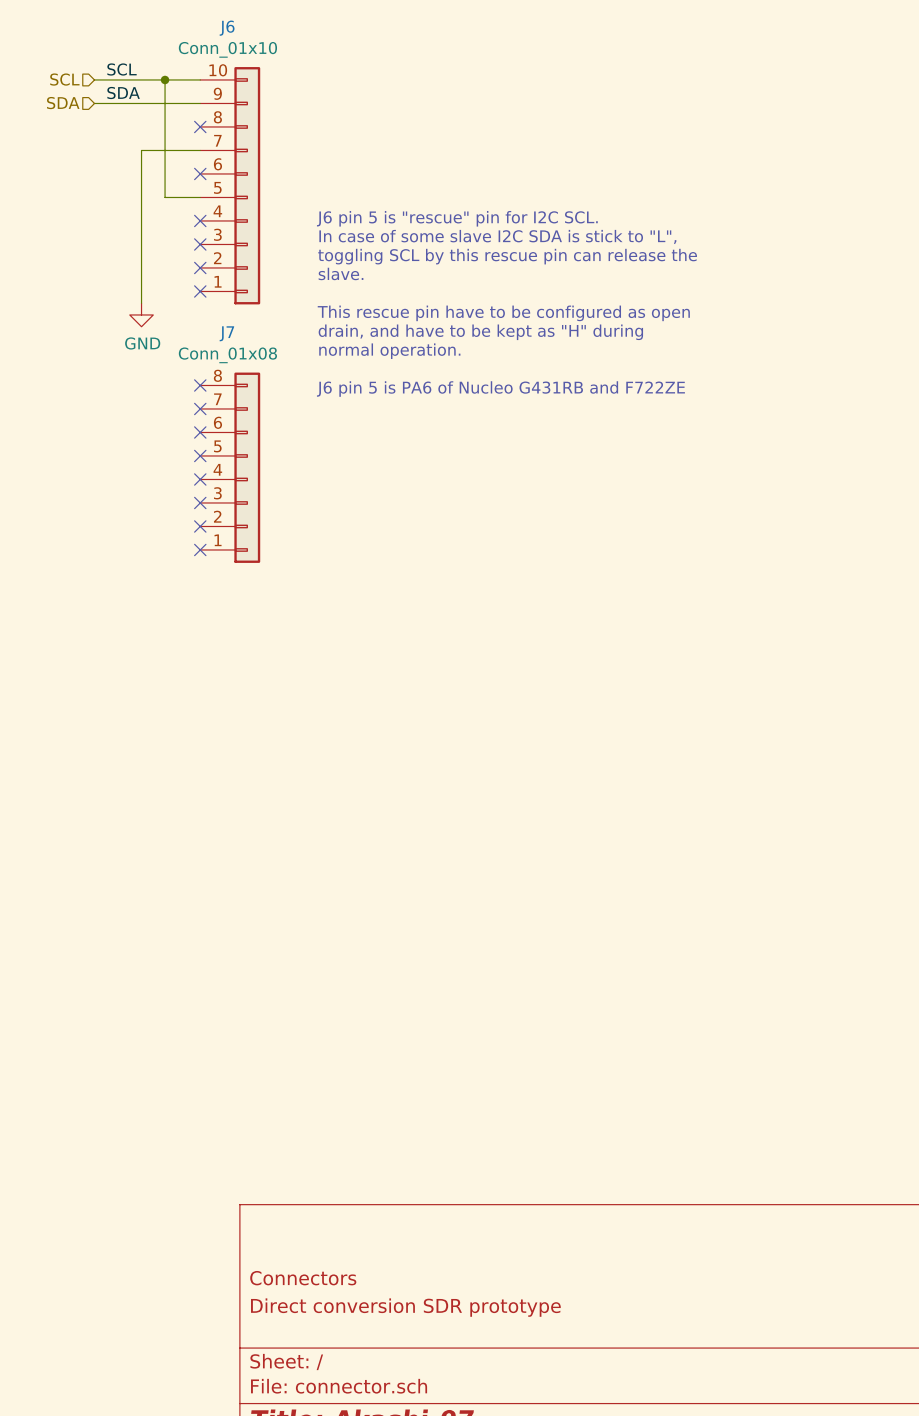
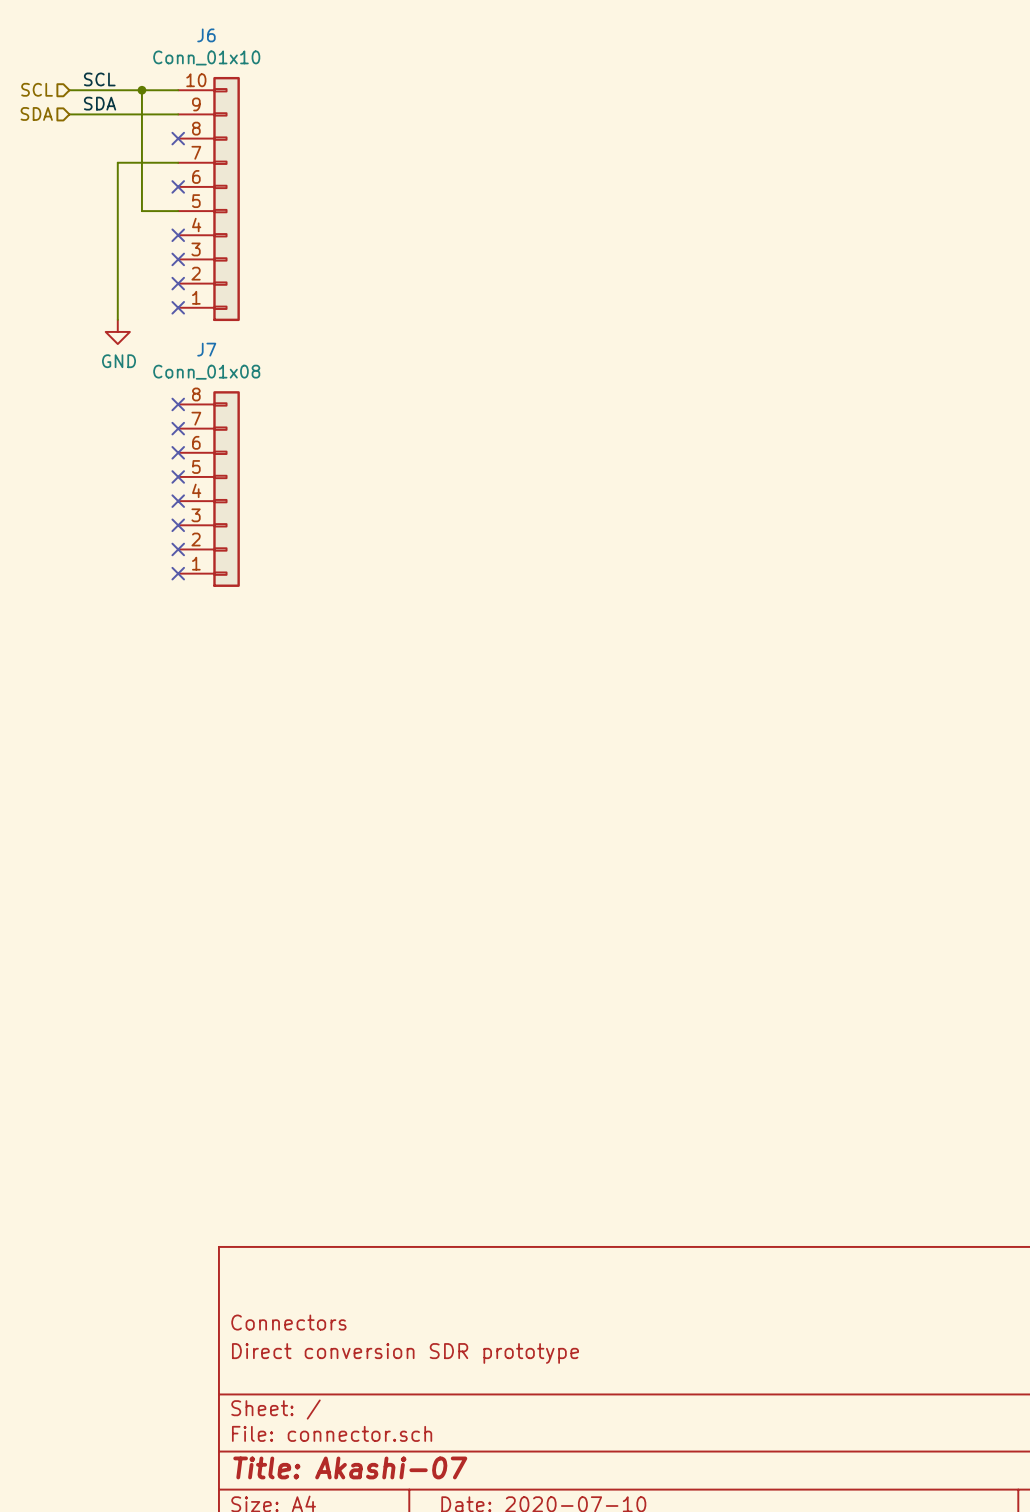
text: J6 pin 5 is "rescue" pin for I2C SCL. (457, 218) -> none
text: In case of some slave I2C SDA is stick to "L", (497, 236) -> none
text: toggling SCL by this rescue pin can release the (507, 256) -> none
text: slave. (341, 273) -> none
text: This rescue pin have to be configured as open (503, 313) -> none
text: drain, and have to be kept as "H" during (480, 332) -> none
text: normal operation. (389, 351) -> none
text: J6 pin 5 is PA6 of Nucleo G431RB and F722ZE (500, 389) -> none

